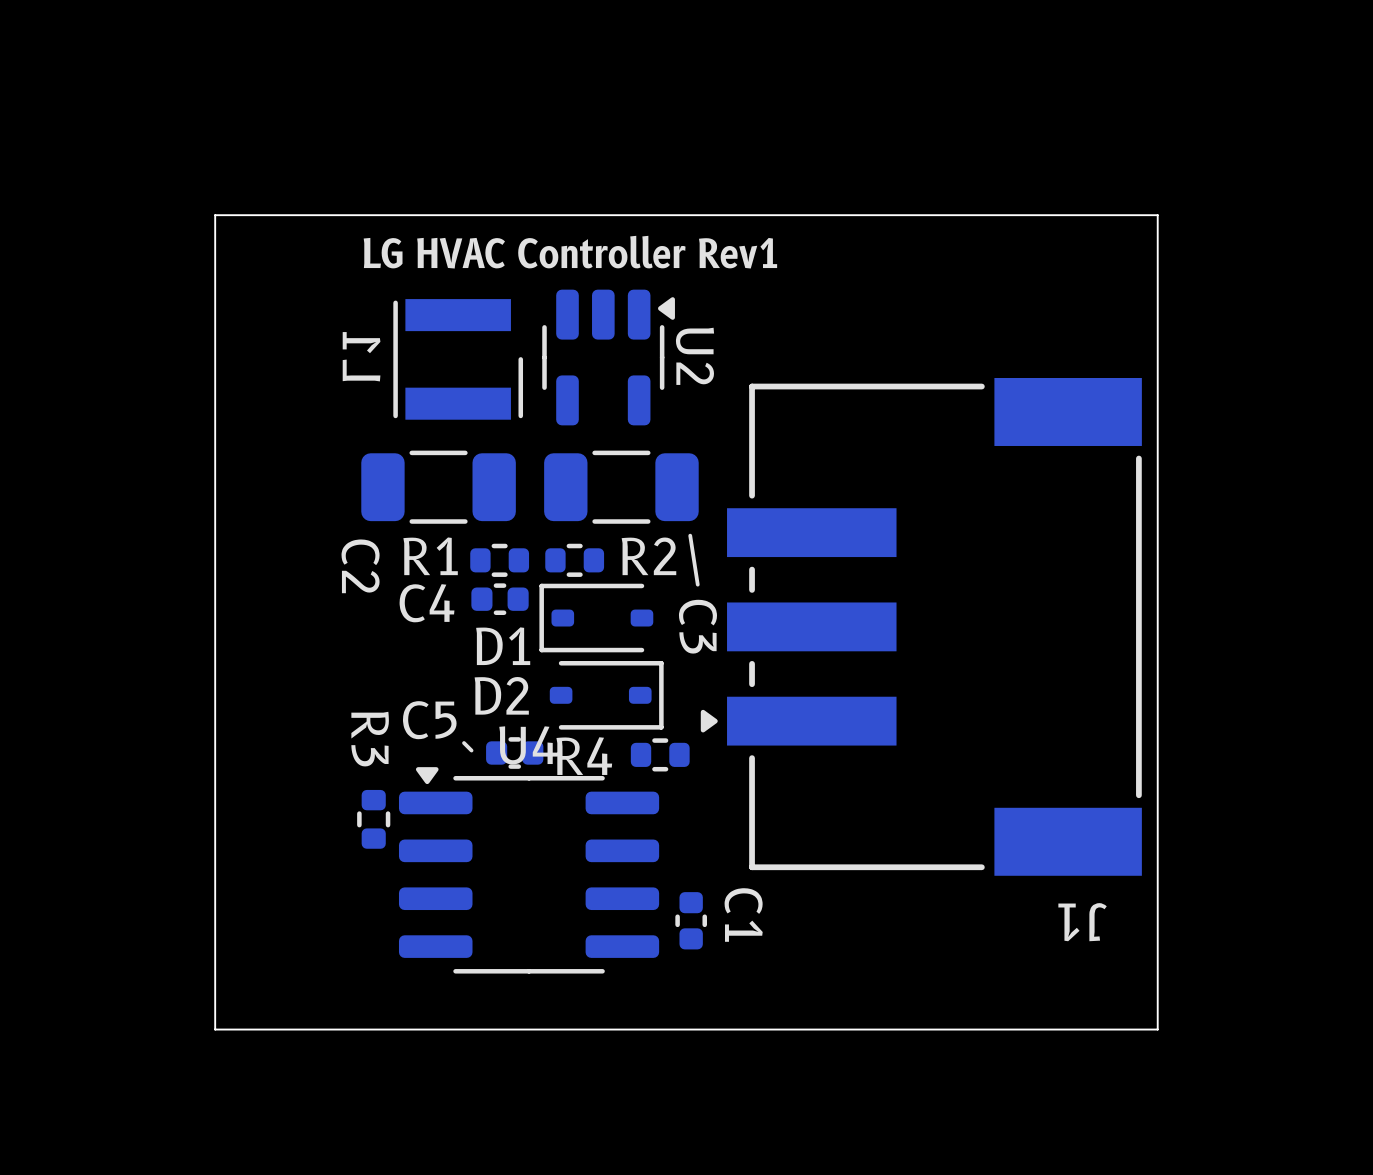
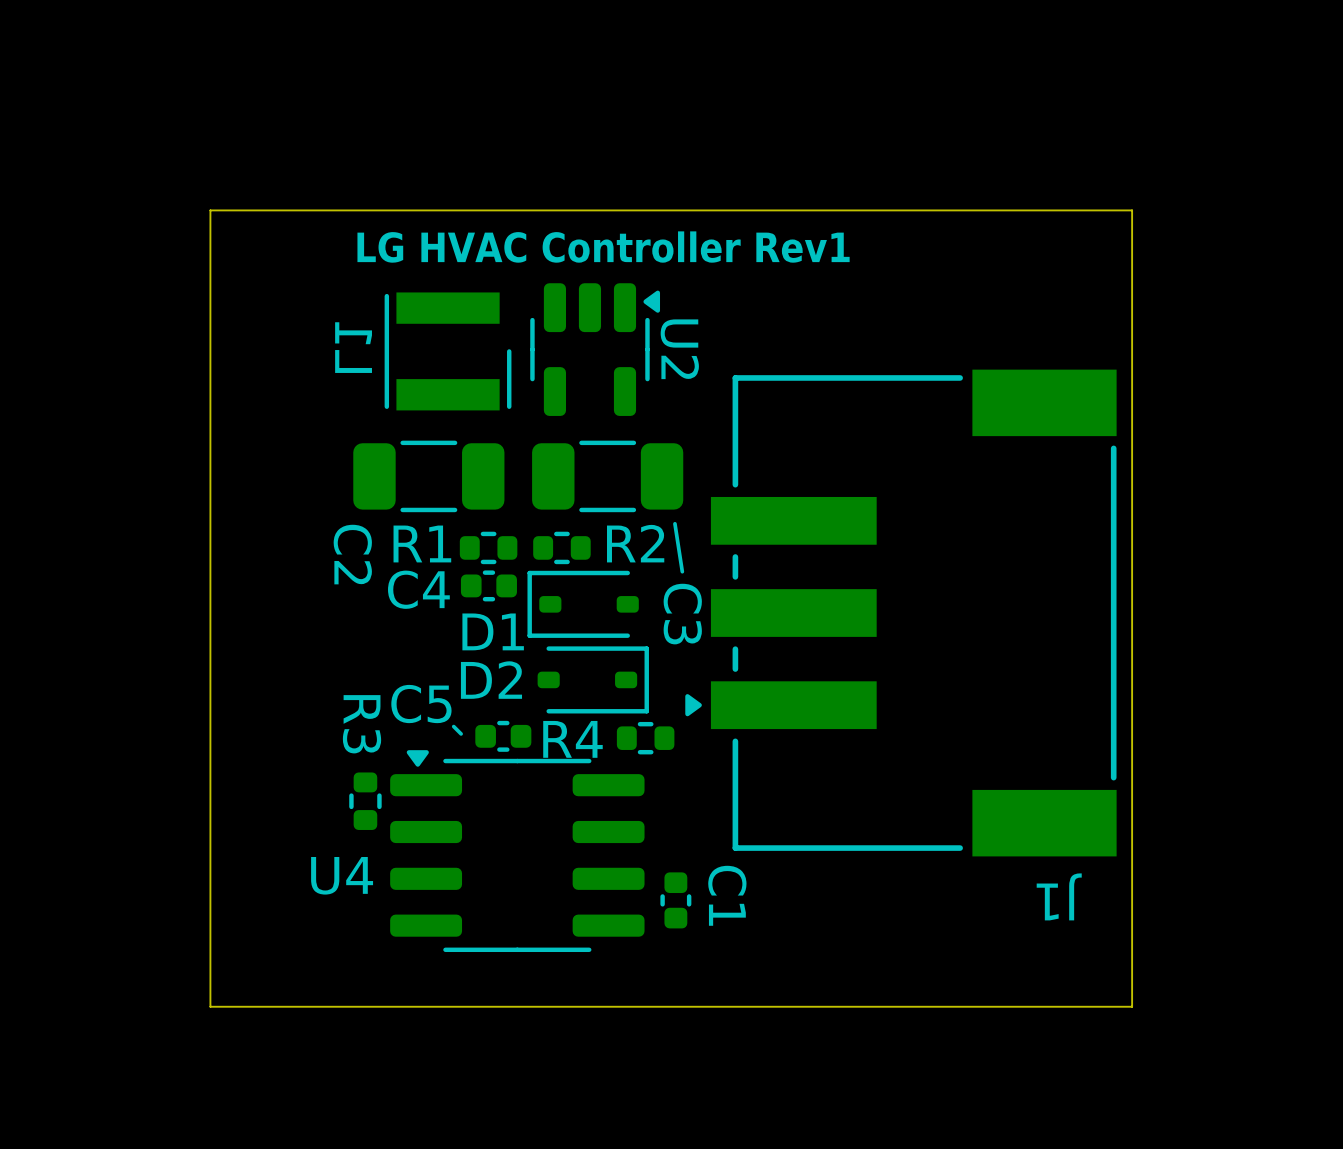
U4 name position: U4 (528, 745) -> U4 (342, 875)

